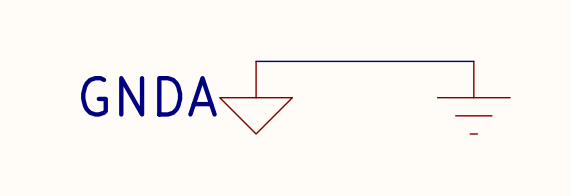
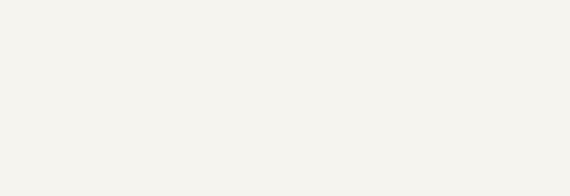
wire: (256, 61) (473, 61) -> none
power symbol: GNDA (256, 97) -> none
power symbol: (473, 97) -> none

